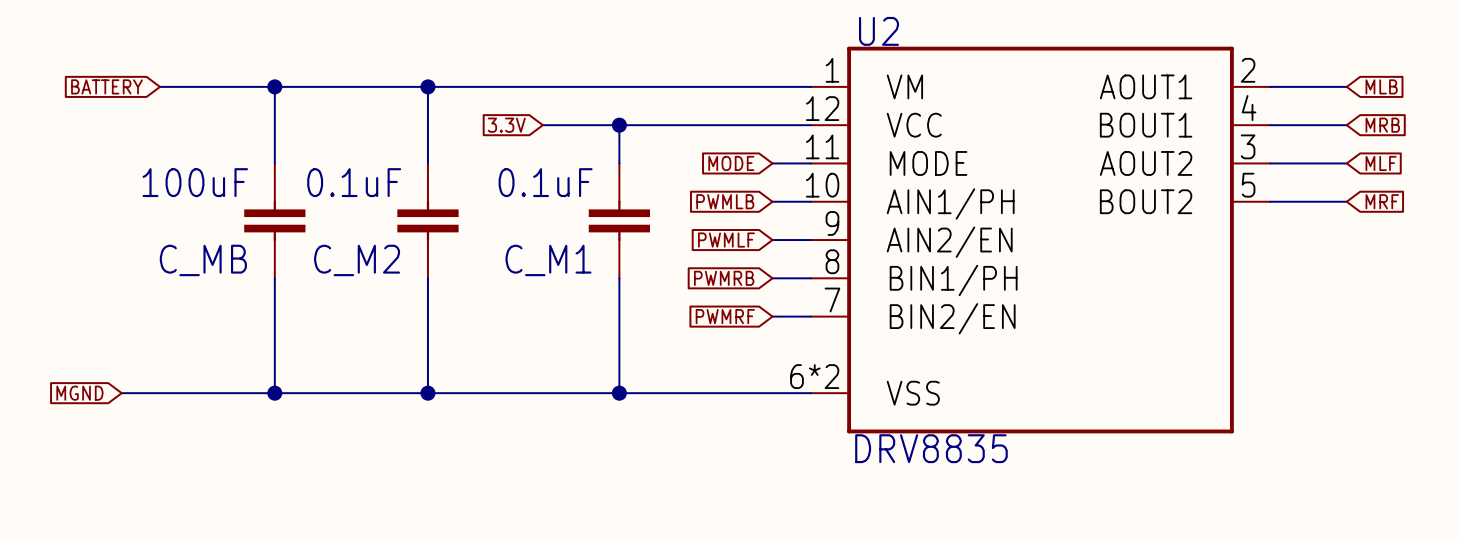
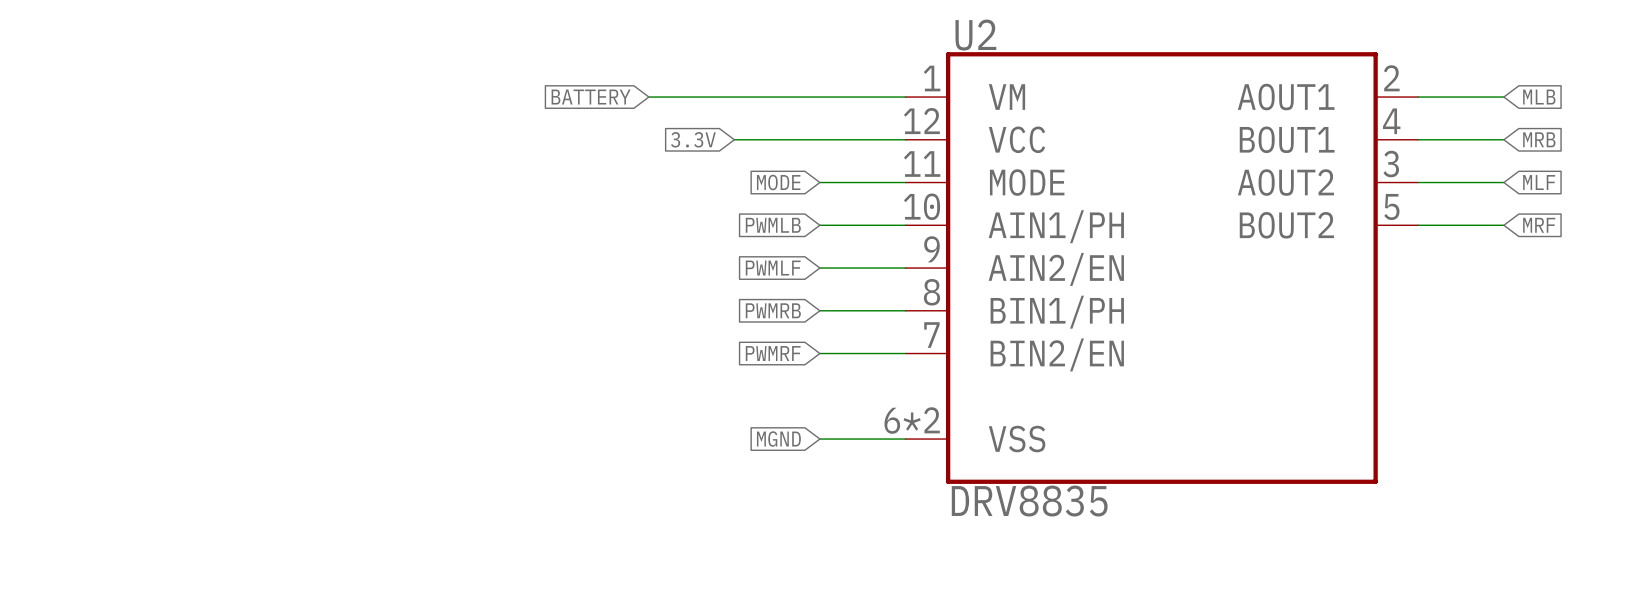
global label: BATTERY (107, 86) -> none
wire: (159, 86) (581, 86) -> none
wire: (274, 86) (274, 163) -> none
junction: (274, 86) -> none
wire: (427, 86) (427, 163) -> none
junction: (427, 86) -> none
global label: none -> BATTERY (591, 97)
global label position: 3.3V (506, 125) -> 3.3V (693, 139)
wire: (542, 125) (657, 125) -> none
wire: (619, 125) (619, 163) -> none
junction: (619, 125) -> none
global label position: MODE (731, 163) -> MODE (778, 182)
wire: none -> (819, 182) (862, 182)
global label position: PWMLB (725, 201) -> PWMLB (773, 225)
wire: none -> (819, 225) (862, 225)
C_MB: 100uF (274, 220) -> none
C_M2: 0.1uF (427, 220) -> none
C_M1: 0.1uF (619, 220) -> none
global label position: PWMLF (726, 240) -> PWMLF (773, 268)
wire: none -> (819, 268) (862, 268)
wire: (274, 278) (274, 393) -> none
wire: (427, 278) (427, 393) -> none
wire: (619, 278) (619, 393) -> none
global label position: PWMRB (724, 278) -> PWMRB (773, 310)
wire: none -> (819, 310) (862, 310)
global label position: PWMRF (725, 316) -> PWMRF (773, 353)
wire: none -> (819, 353) (862, 353)
global label: MGND (79, 393) -> none
wire: (121, 393) (734, 393) -> none
junction: (274, 393) -> none
junction: (427, 393) -> none
junction: (619, 393) -> none
global label: none -> MGND (778, 439)

